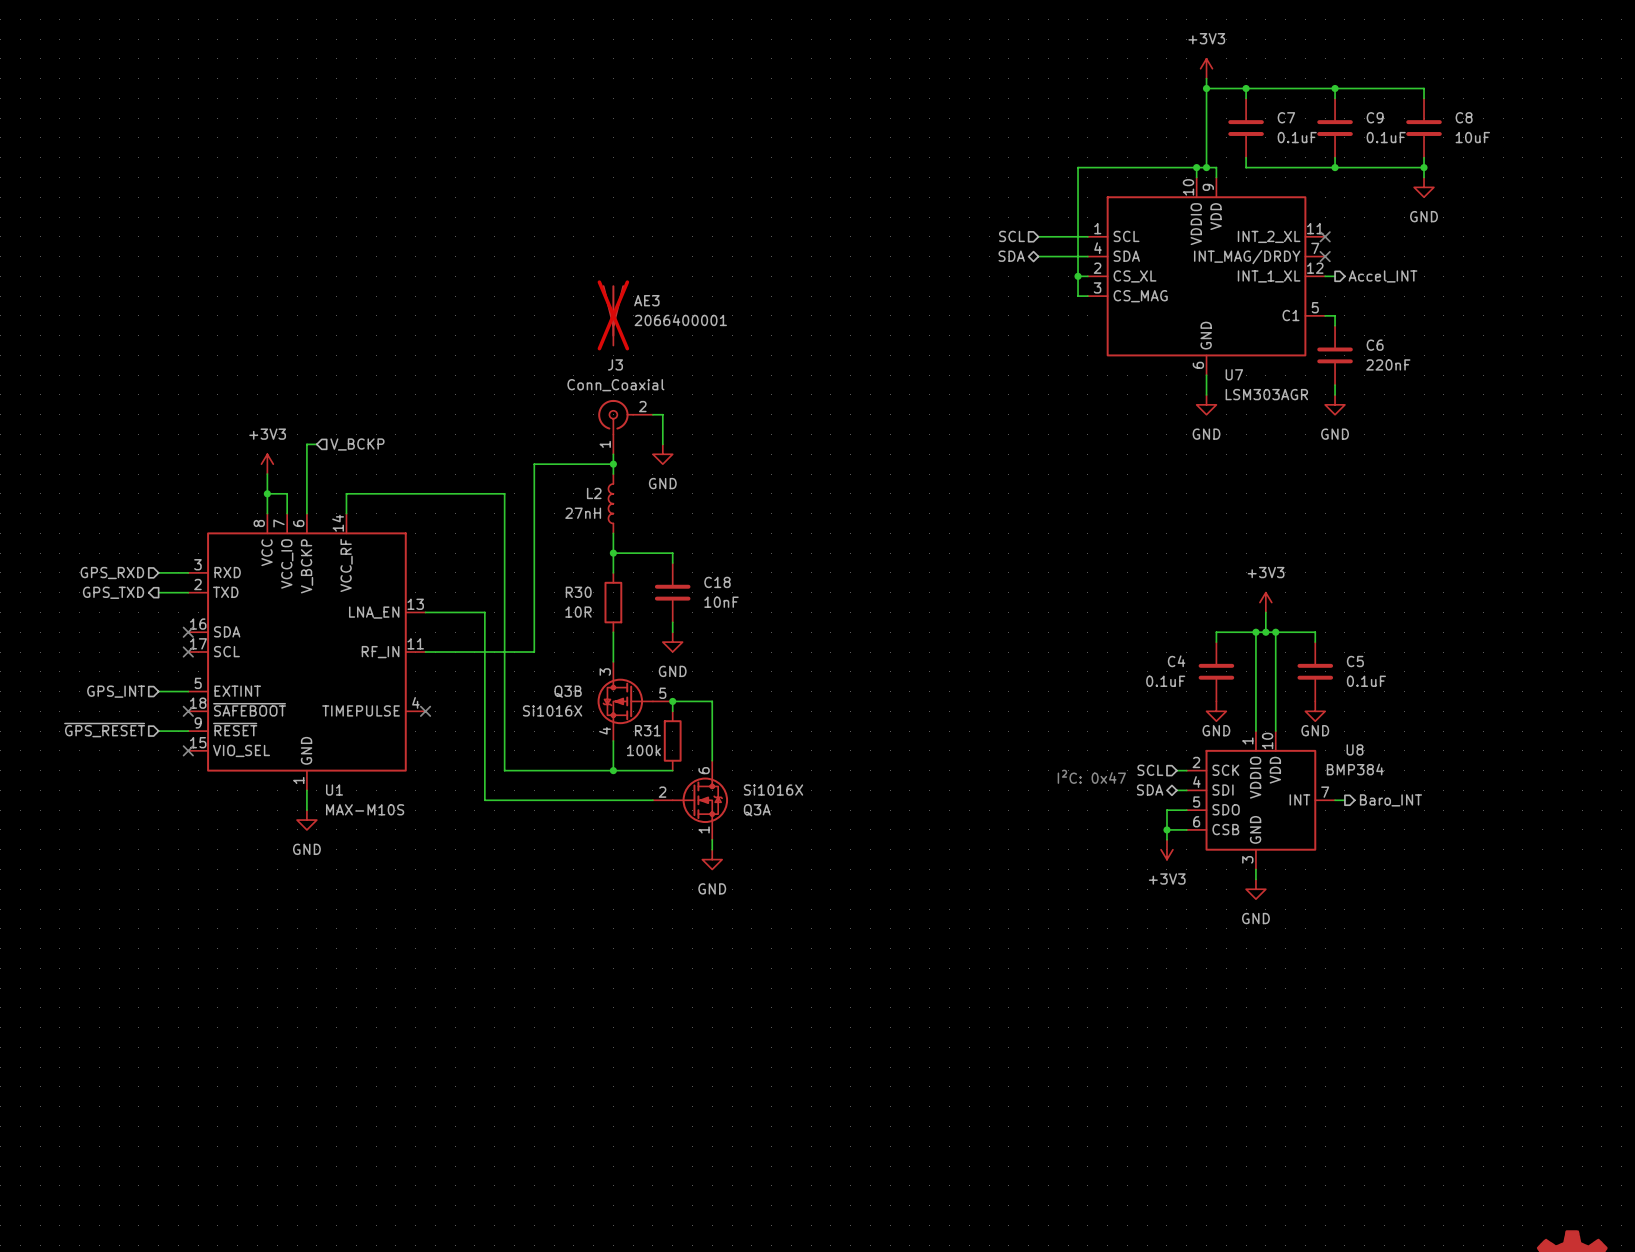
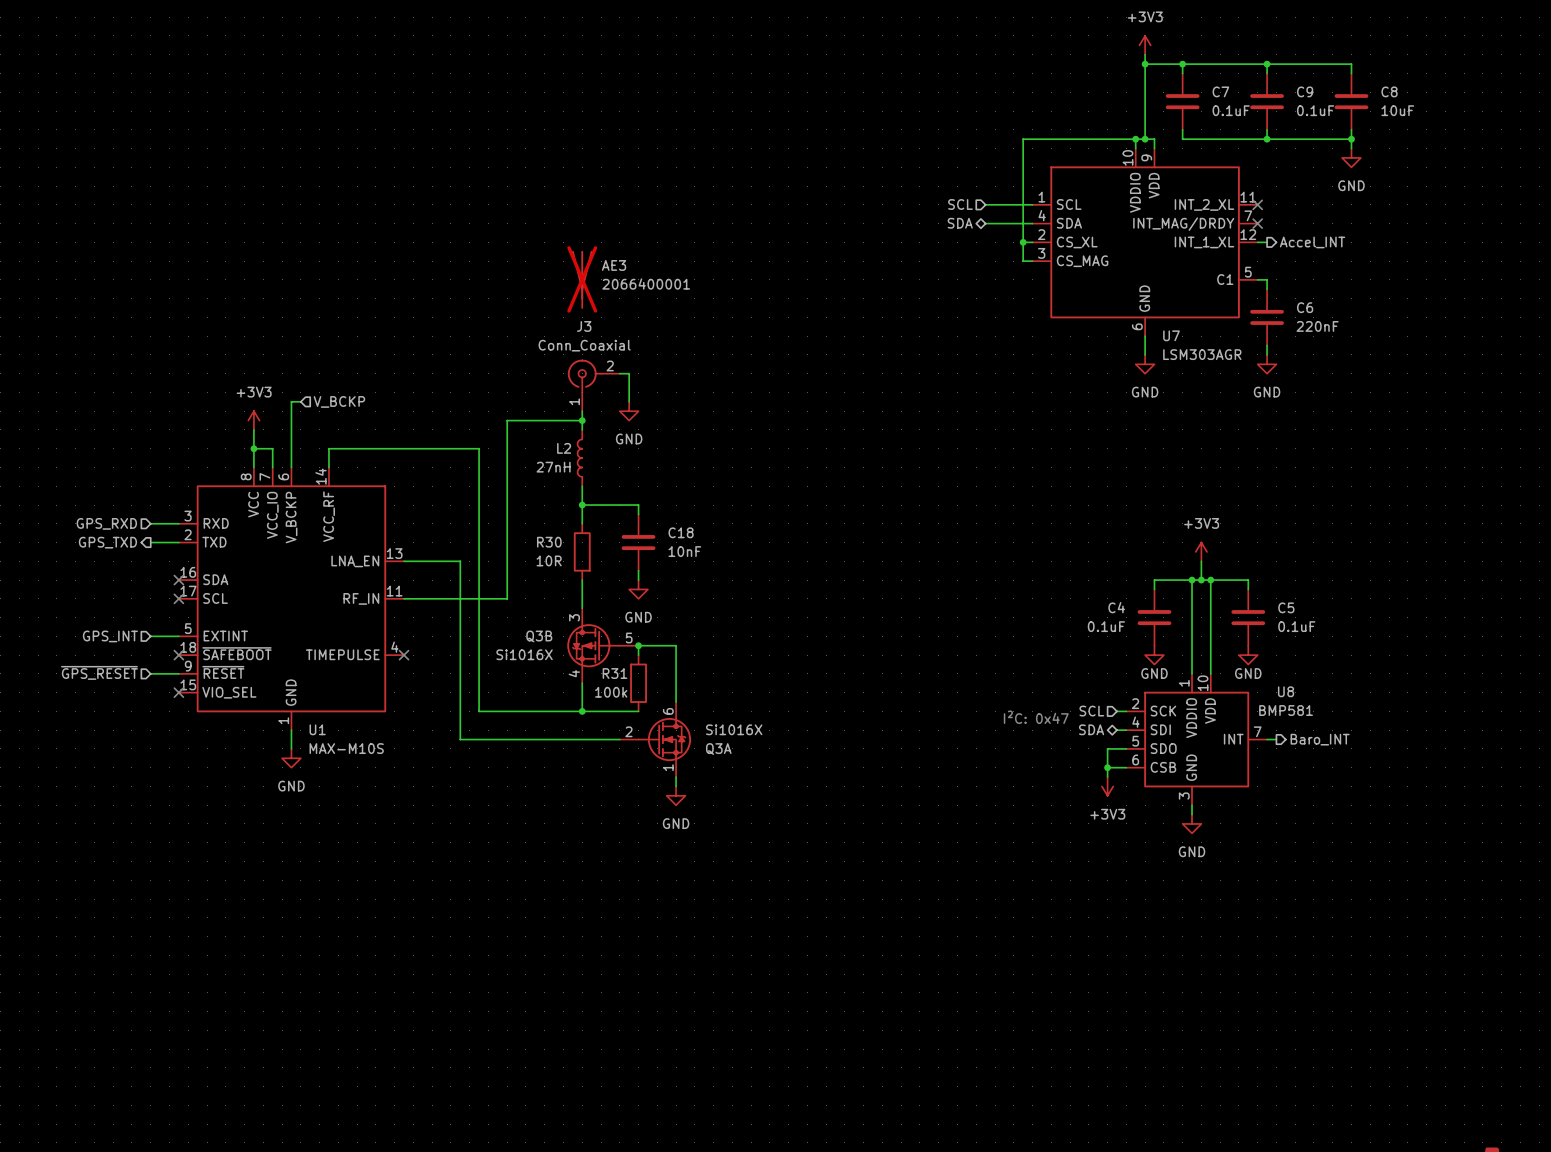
U8 value: BMP384 (1355, 769) -> BMP581 (1286, 710)

